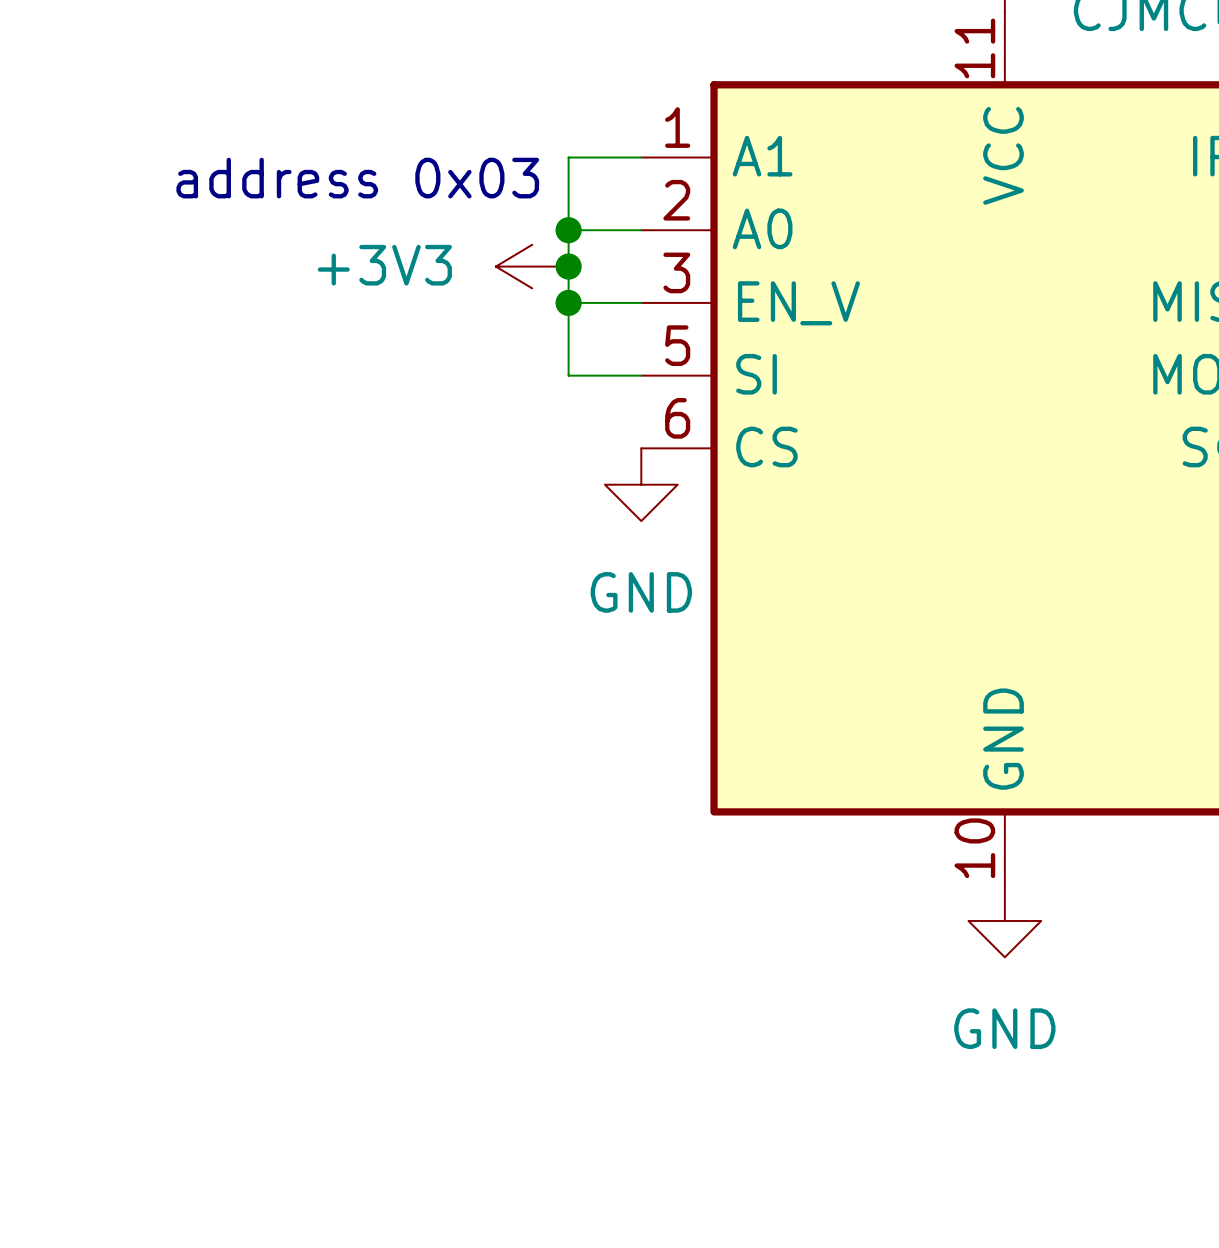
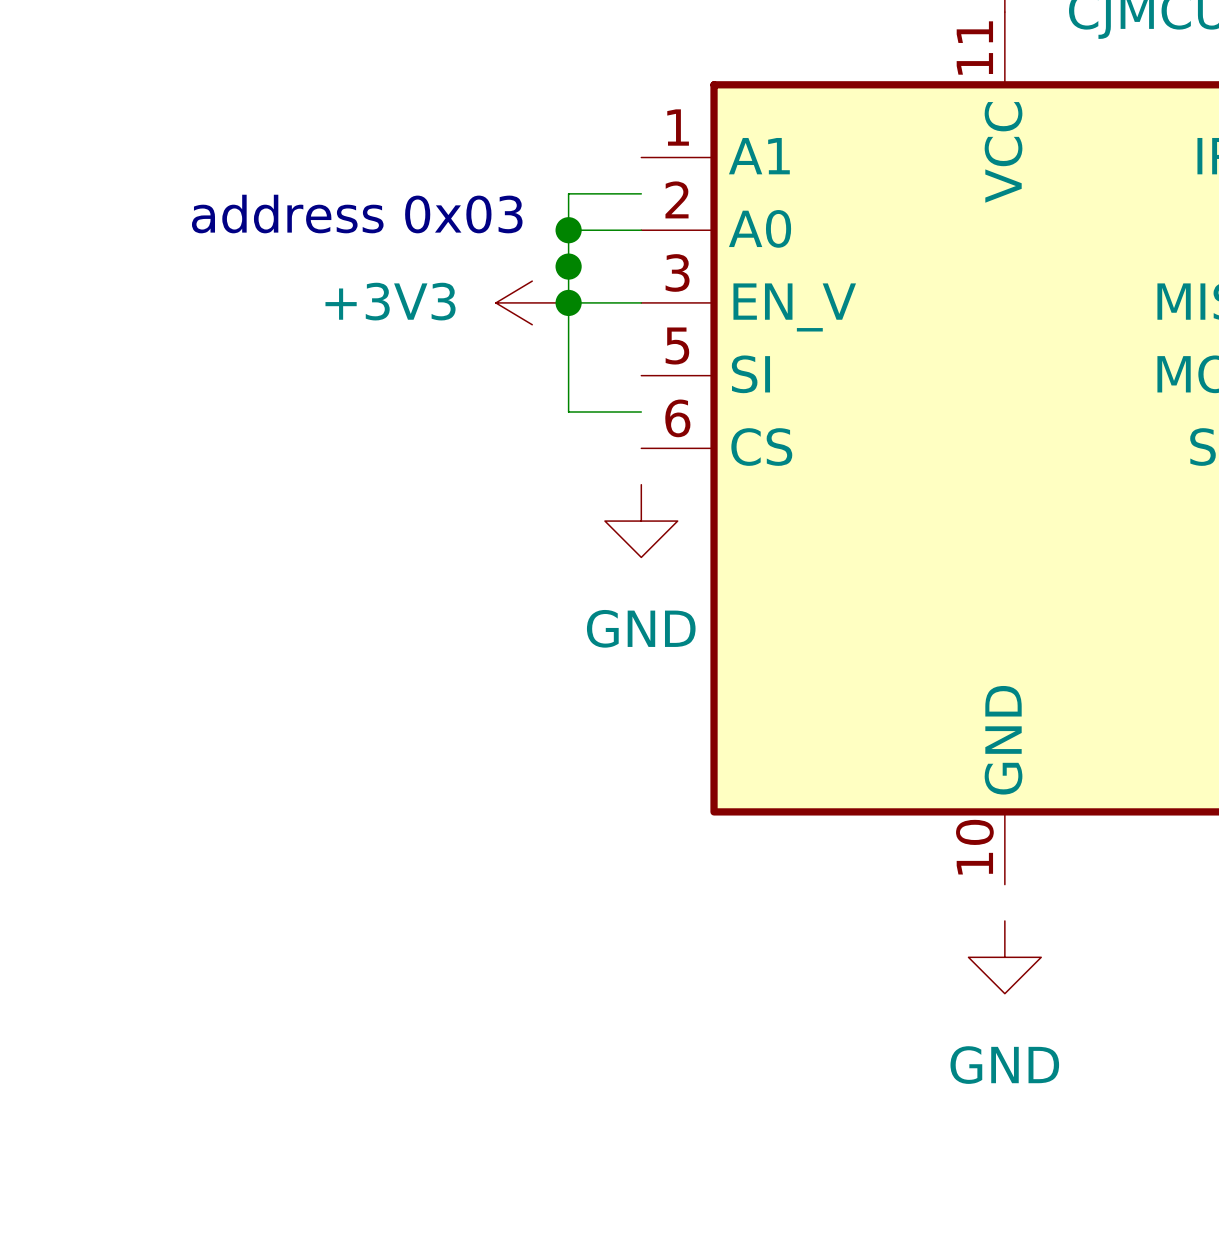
wire: (641, 157) (568, 157) (568, 193) -> (641, 193) (568, 193)
text position: address 0x03 (357, 178) -> address 0x03 (357, 214)
power symbol position: +3V3 (532, 266) -> +3V3 (532, 302)
wire: (568, 375) (641, 375) -> (568, 375) (568, 412) (641, 412)
power symbol position: GND (641, 484) -> GND (641, 521)
power symbol position: GND (1004, 920) -> GND (1004, 957)

